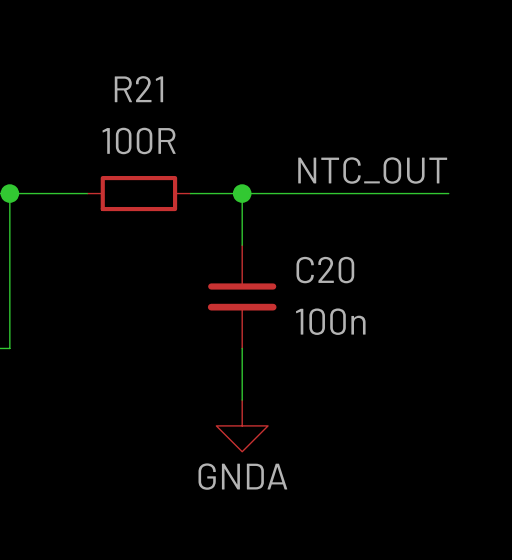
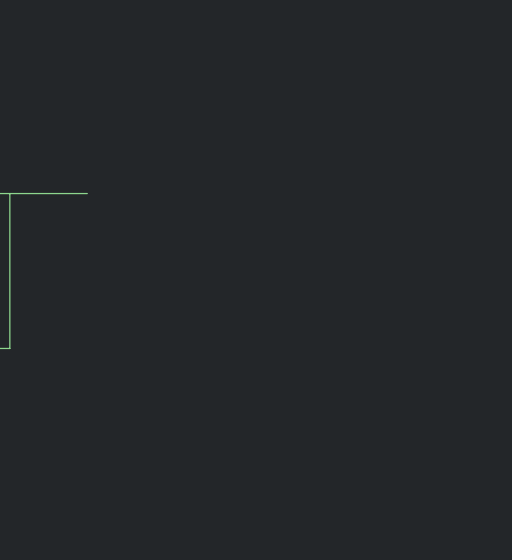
label: NTC_OUT (372, 170) -> none
junction: (9, 193) -> none
R21: 100R (138, 193) -> none
wire: (190, 193) (448, 193) -> none
wire: (242, 193) (242, 245) -> none
junction: (242, 193) -> none
C20: 100n (242, 296) -> none
wire: (242, 348) (242, 400) -> none
power symbol: GNDA (242, 425) -> none

